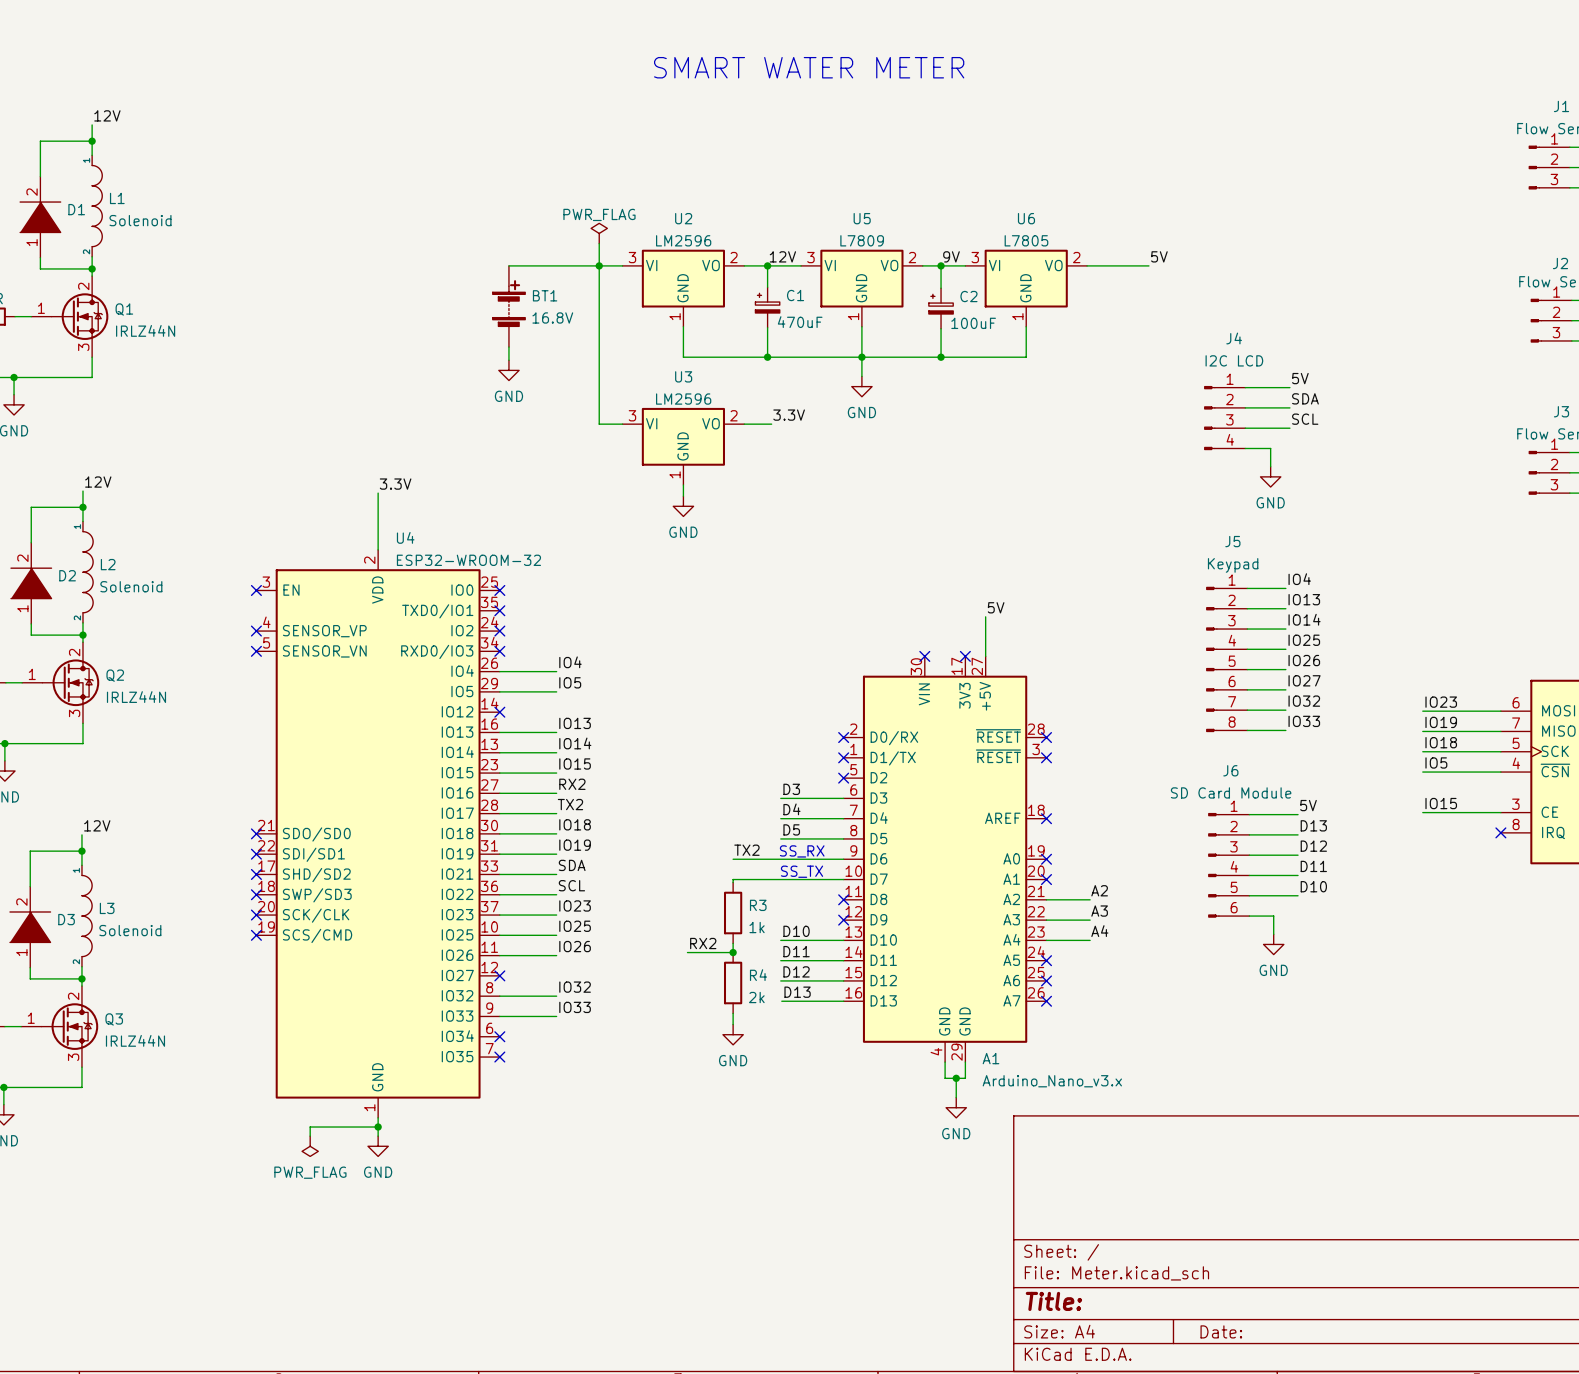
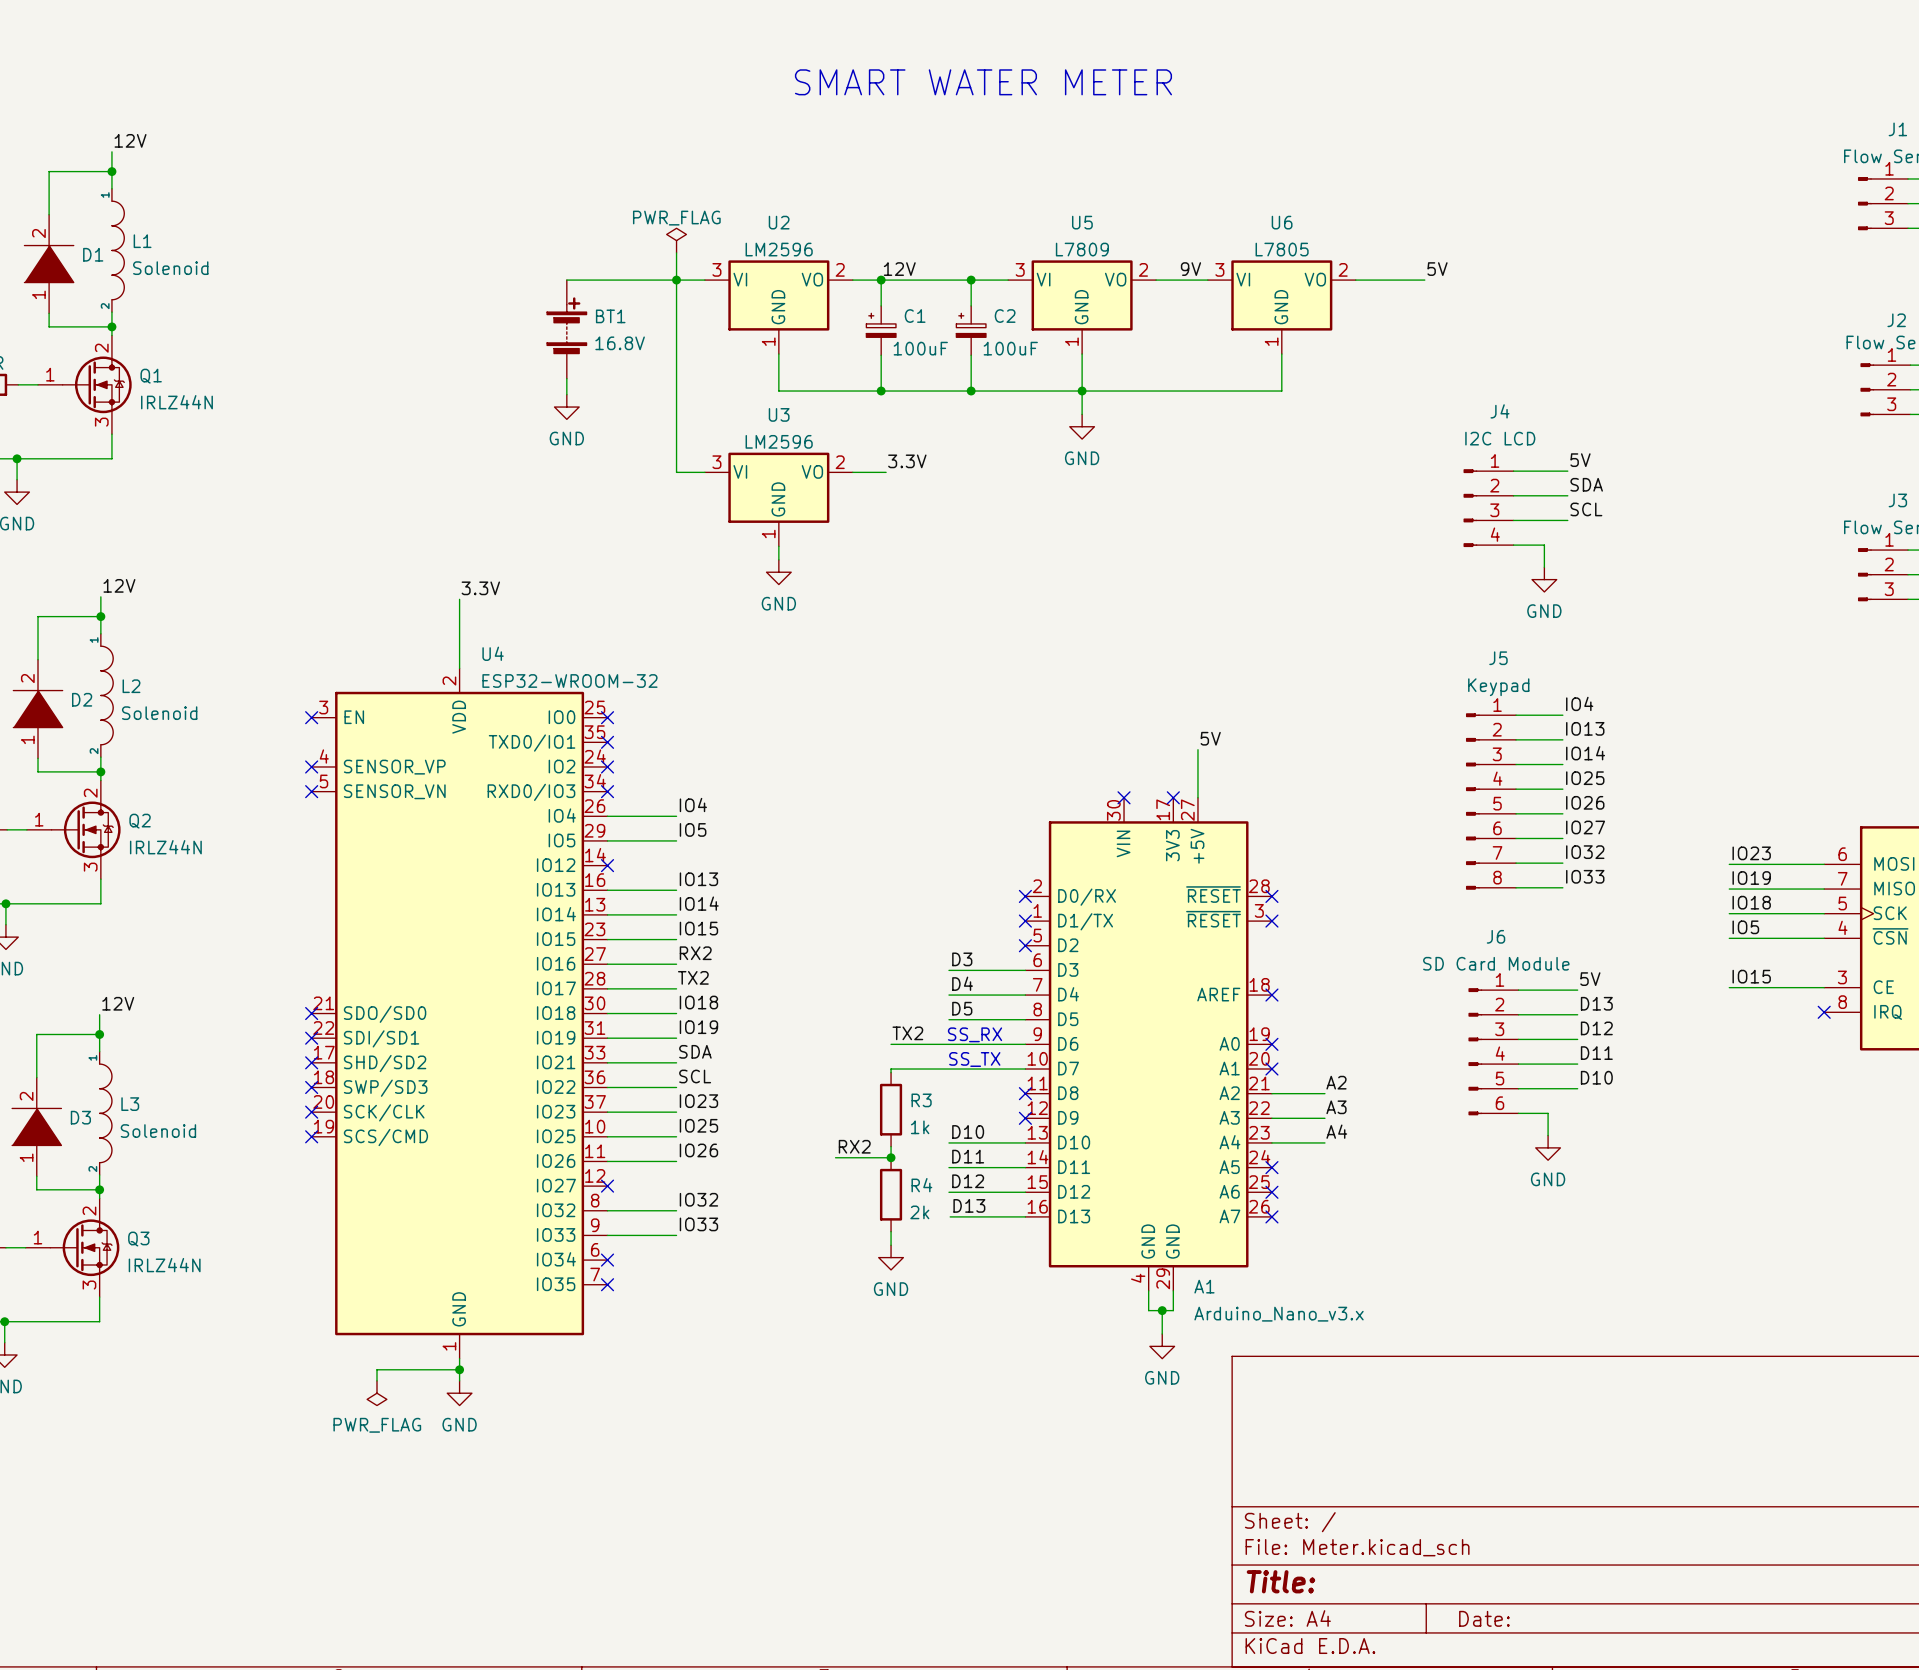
junction: none -> (676, 280)
wire: none -> (852, 280) (1008, 280)
junction: none -> (881, 280)
wire: none -> (971, 280) (971, 305)
junction: none -> (971, 280)
wire: none -> (1355, 280) (1424, 280)
power symbol position: PWR_FLAG (599, 233) -> PWR_FLAG (676, 240)
wire: (599, 243) (599, 424) (622, 424) -> (676, 252) (676, 472) (704, 472)
label position: 12V (782, 256) -> 12V (899, 269)
label position: 9V (951, 256) -> 9V (1190, 269)
label position: 5V (1159, 256) -> 5V (1437, 269)
wire: (508, 265) (622, 265) -> (566, 280) (704, 280)
junction: (599, 265) -> none
wire: (744, 265) (801, 265) -> none
wire: (767, 265) (767, 287) -> (881, 280) (881, 305)
junction: (767, 265) -> none
wire: (922, 265) (965, 265) -> (1156, 280) (1207, 280)
wire: (941, 265) (941, 288) -> none
junction: (941, 265) -> none
wire: (1087, 265) (1148, 265) -> none
U2 position: (683, 288) -> (778, 307)
U5 position: (861, 288) -> (1082, 307)
U6 position: (1026, 288) -> (1281, 307)
wire: none -> (778, 354) (778, 391) (1281, 391) (1281, 354)
wire: none -> (971, 355) (971, 391)
BT1 position: (508, 306) -> (566, 329)
C1 position: (767, 307) -> (881, 330)
C2 position: (941, 308) -> (971, 330)
junction: none -> (881, 391)
junction: none -> (971, 391)
junction: none -> (1082, 391)
C1 value: 470uF (800, 322) -> 100uF (920, 348)
wire: (683, 326) (683, 357) (1026, 357) (1026, 326) -> none
wire: (861, 326) (861, 376) -> (1082, 354) (1082, 414)
wire: (767, 327) (767, 357) -> (881, 355) (881, 391)
wire: (941, 328) (941, 357) -> none
wire: (508, 347) (508, 360) -> (566, 378) (566, 394)
junction: (767, 357) -> none
junction: (861, 357) -> none
junction: (941, 357) -> none
power symbol position: GND (508, 370) -> GND (566, 407)
power symbol position: GND (861, 386) -> GND (1082, 426)
label position: 3.3V (789, 415) -> 3.3V (907, 461)
wire: (744, 424) (771, 424) -> (852, 472) (886, 472)
U3 position: (683, 446) -> (778, 499)
wire: (683, 485) (683, 496) -> (778, 546) (778, 559)
power symbol position: GND (683, 506) -> GND (778, 572)

